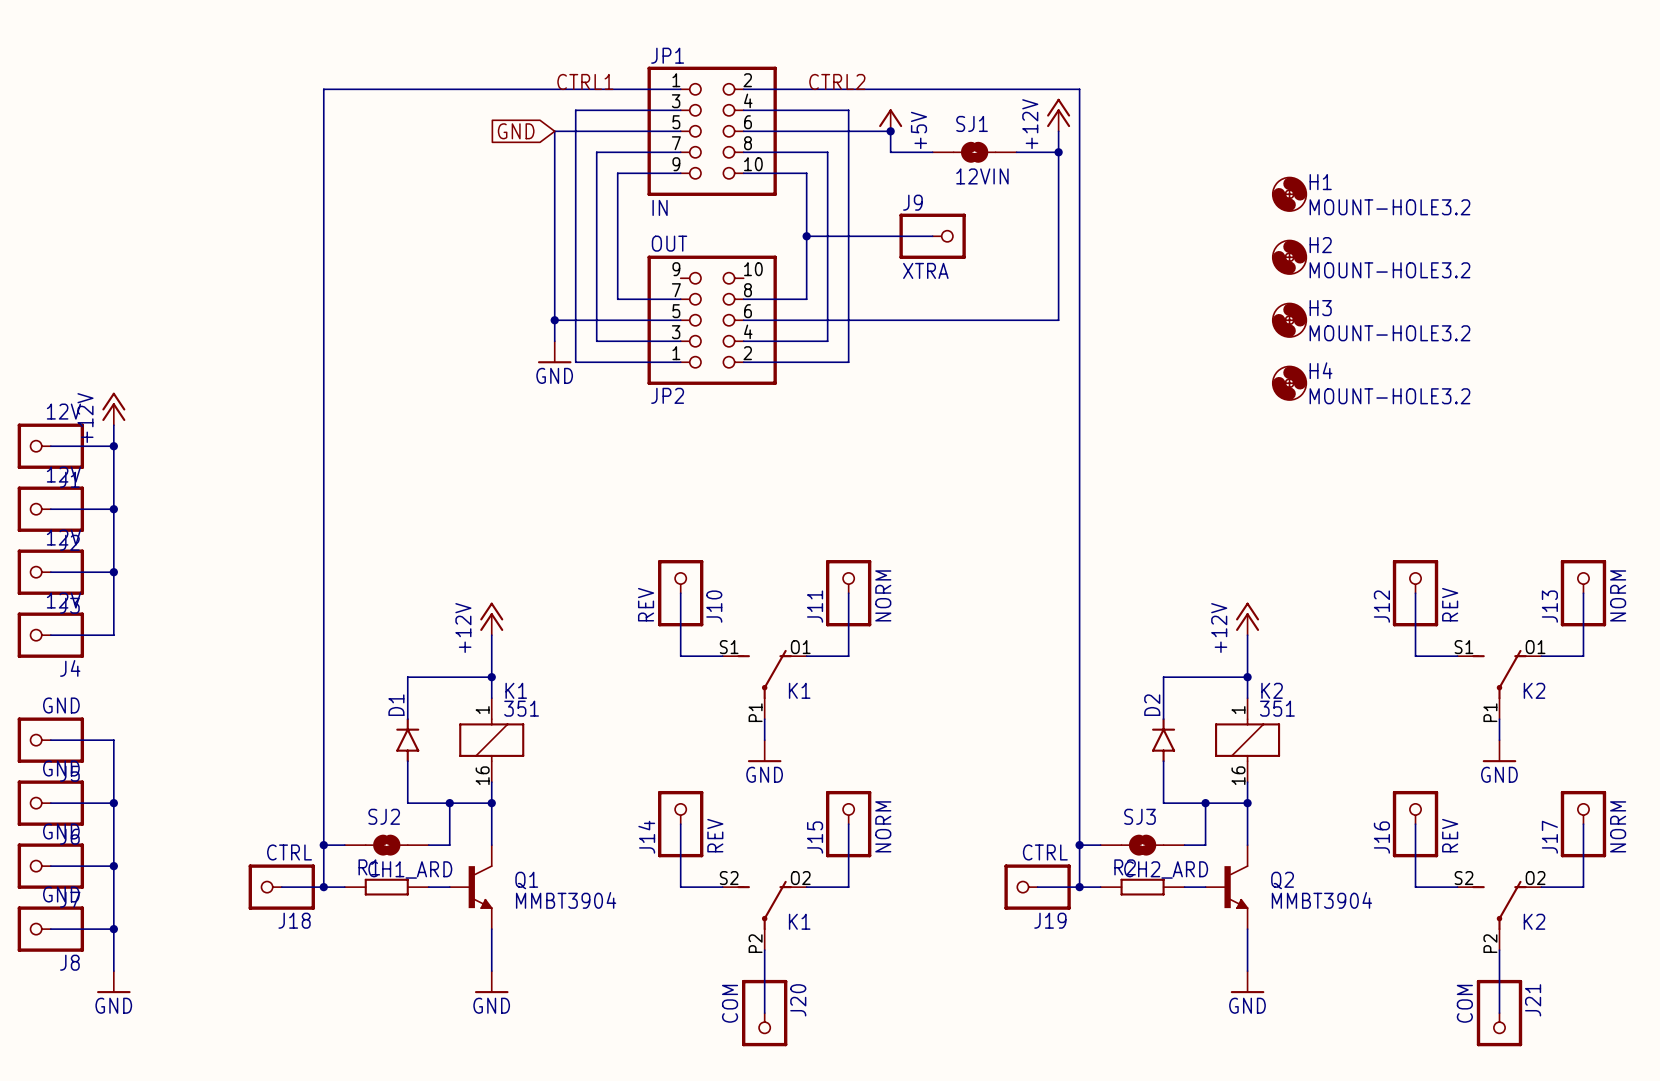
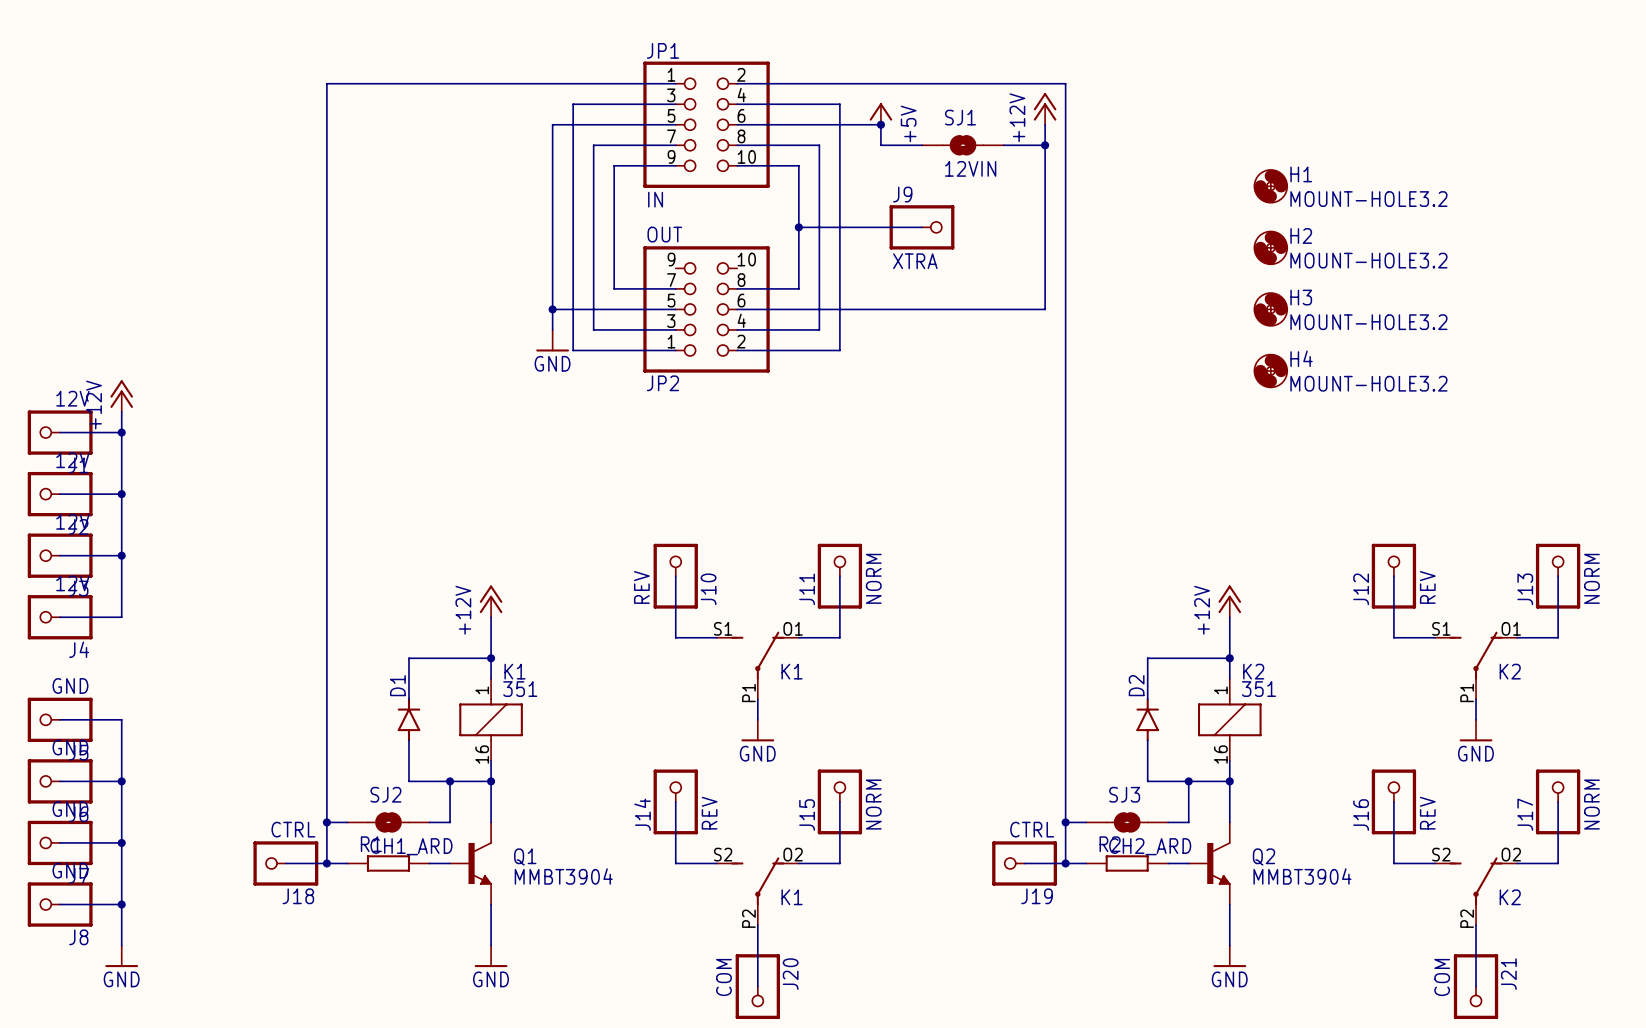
label: CTRL1 (585, 81) -> none
label: CTRL2 (837, 81) -> none
global label: GND (516, 131) -> none

